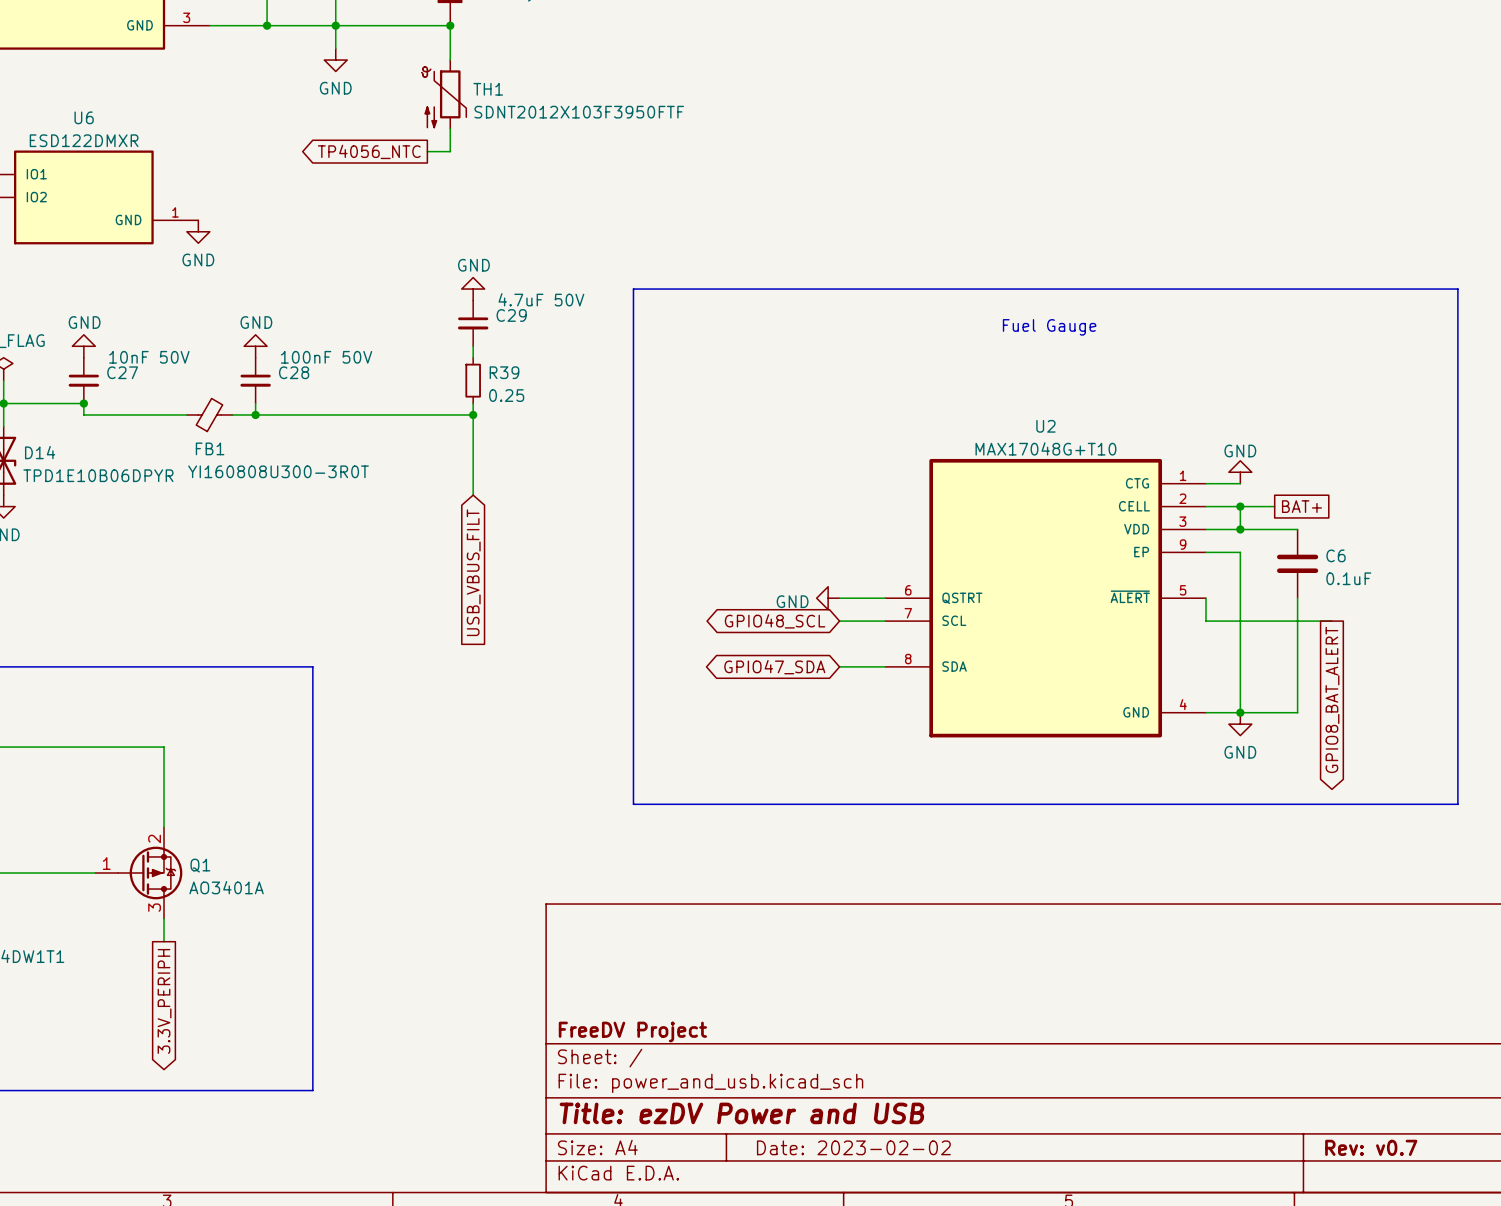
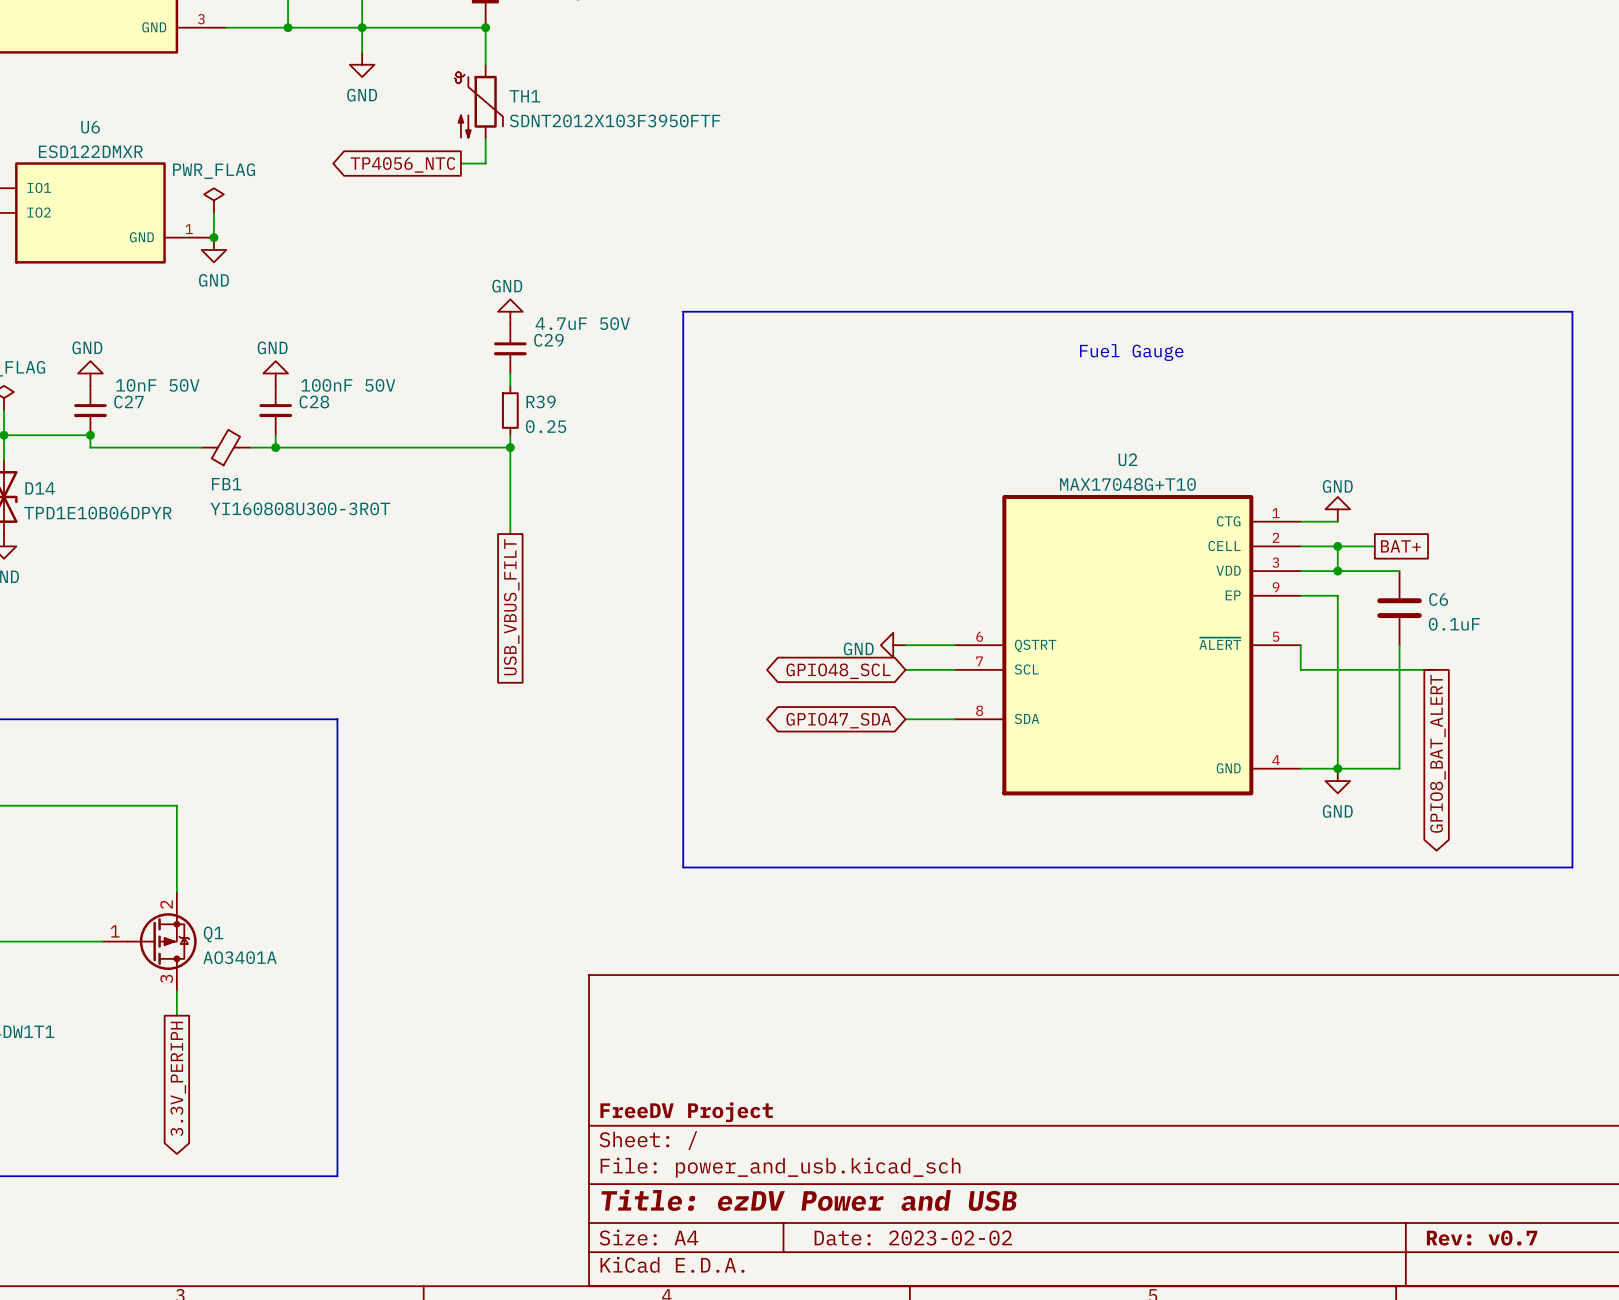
power symbol: none -> PWR_FLAG (213, 200)
wire: none -> (213, 212) (213, 237)
junction: none -> (213, 237)
global label shape: input (473, 572) -> passive (511, 607)

